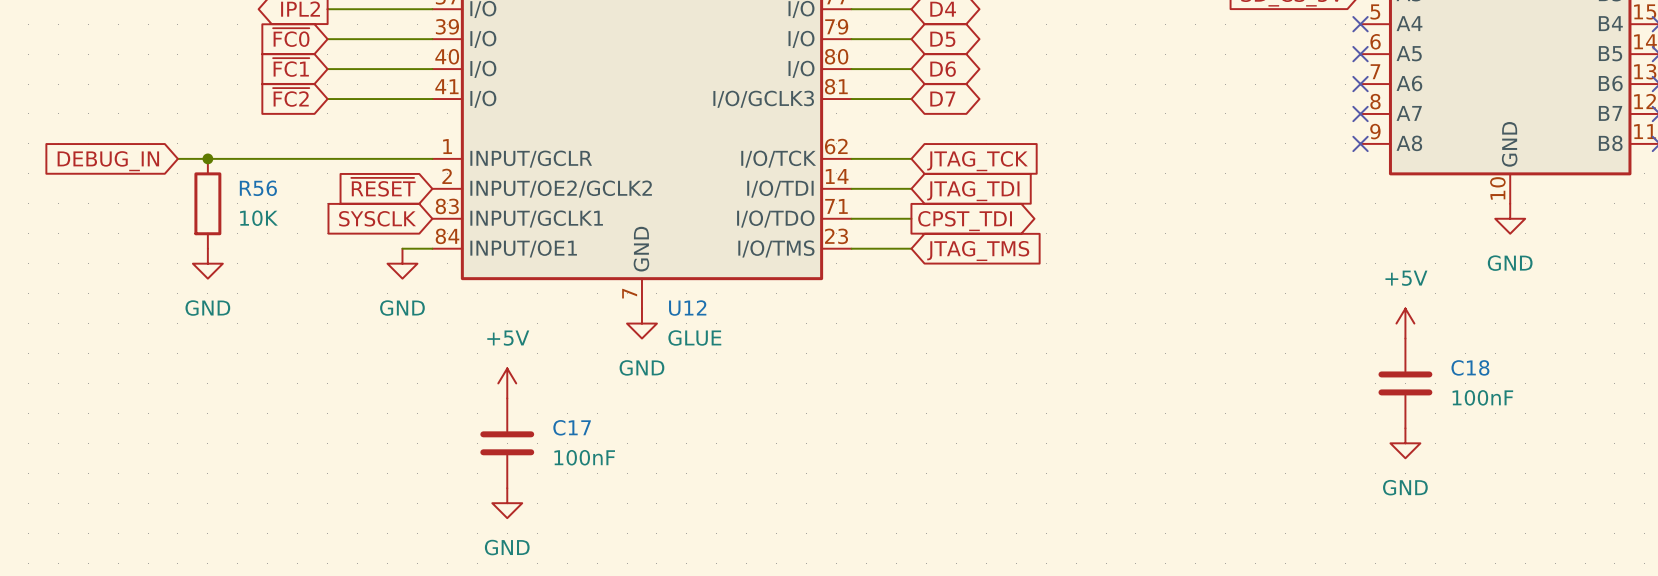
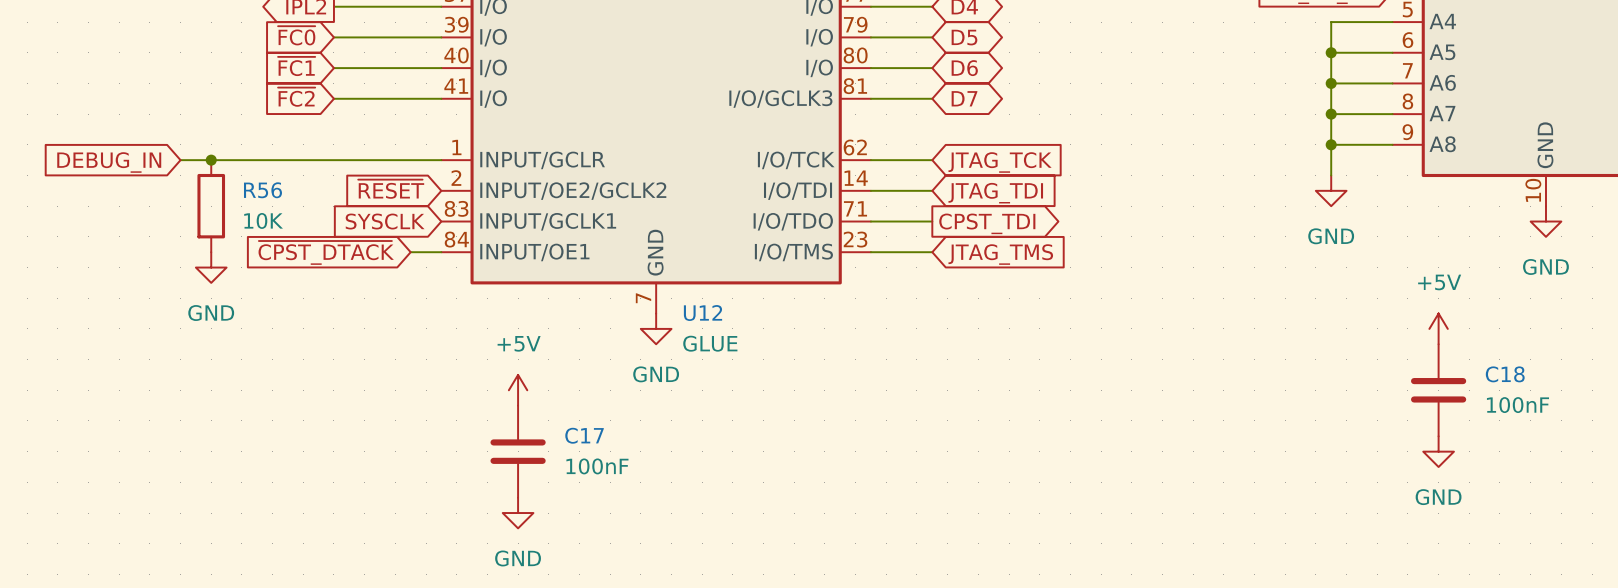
wire: none -> (1392, 22) (1331, 22) (1331, 175)
no-connect mark: (1360, 24) -> none
wire: none -> (1331, 52) (1392, 52)
junction: none -> (1331, 52)
no-connect mark: (1360, 54) -> none
wire: none -> (1331, 83) (1392, 83)
junction: none -> (1331, 83)
no-connect mark: (1360, 84) -> none
wire: none -> (1331, 114) (1392, 114)
junction: none -> (1331, 114)
no-connect mark: (1360, 113) -> none
wire: none -> (1331, 144) (1392, 144)
junction: none -> (1331, 144)
no-connect mark: (1360, 143) -> none
power symbol: none -> GND (1331, 190)
global label: none -> ~{CPST_DTACK} (326, 252)
power symbol: GND (402, 263) -> none

